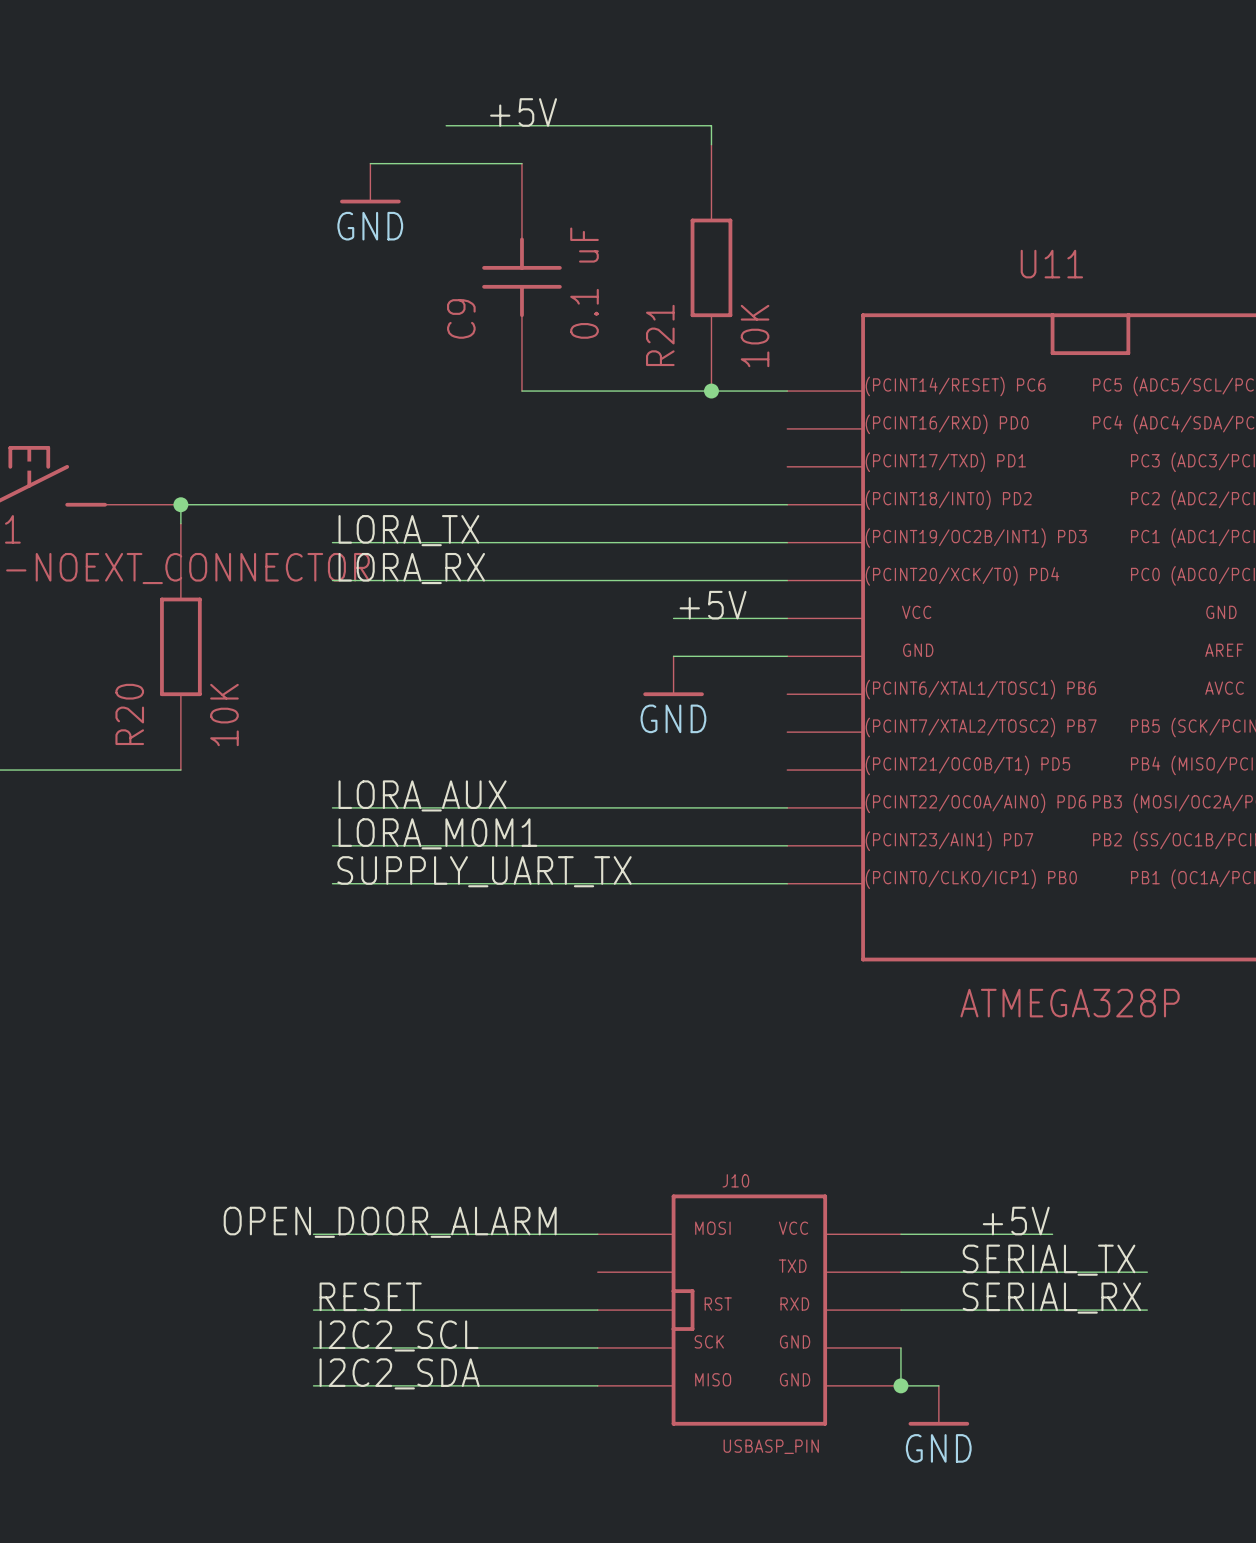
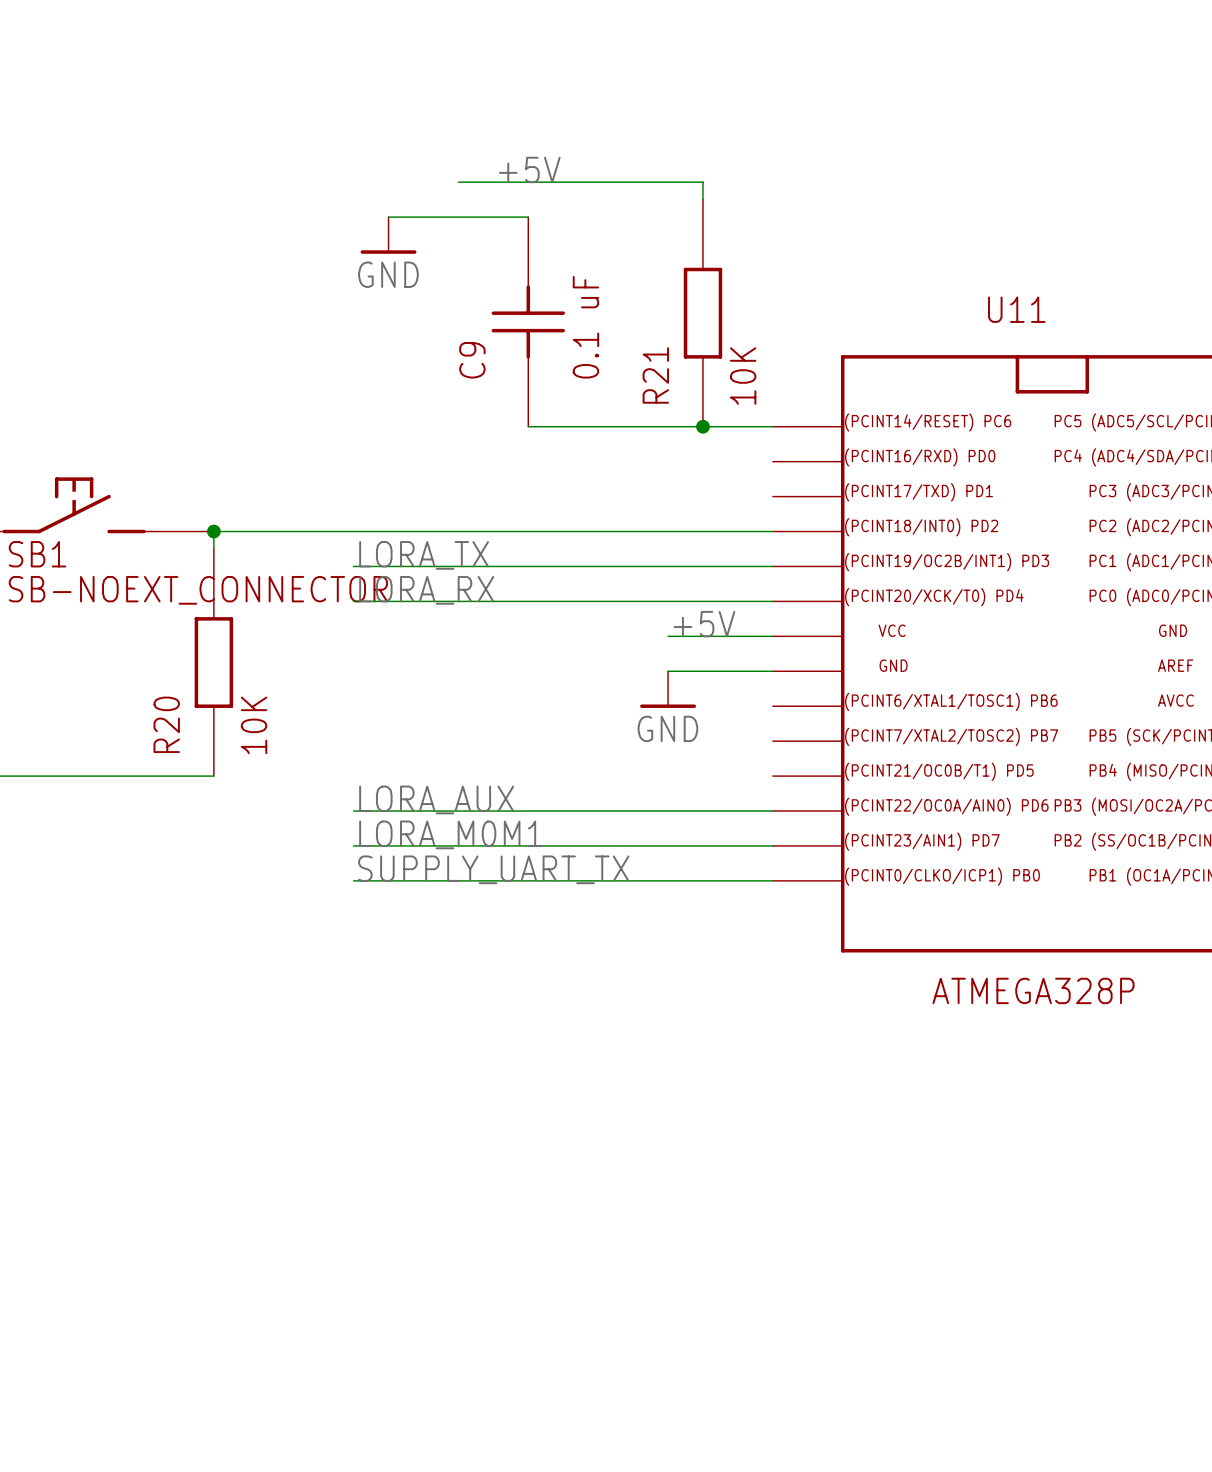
label: +5V (1016, 1221) -> none
label: OPEN_DOOR_ALARM (390, 1222) -> none
wire: (313, 1234) (597, 1234) -> none
wire: (900, 1234) (1052, 1234) -> none
label: SERIAL_TX (1049, 1260) -> none
wire: (900, 1272) (1147, 1272) -> none
label: RESET (370, 1296) -> none
label: SERIAL_RX (1051, 1298) -> none
wire: (313, 1310) (597, 1310) -> none
J10: USBASP_PIN (749, 1310) -> none
wire: (900, 1310) (1147, 1310) -> none
label: I2C2_SCL (399, 1335) -> none
wire: (313, 1347) (597, 1347) -> none
wire: (900, 1347) (900, 1385) (938, 1385) -> none
label: I2C2_SDA (399, 1373) -> none
wire: (313, 1385) (597, 1385) -> none
junction: (900, 1385) -> none
power symbol: GND (938, 1405) -> none

